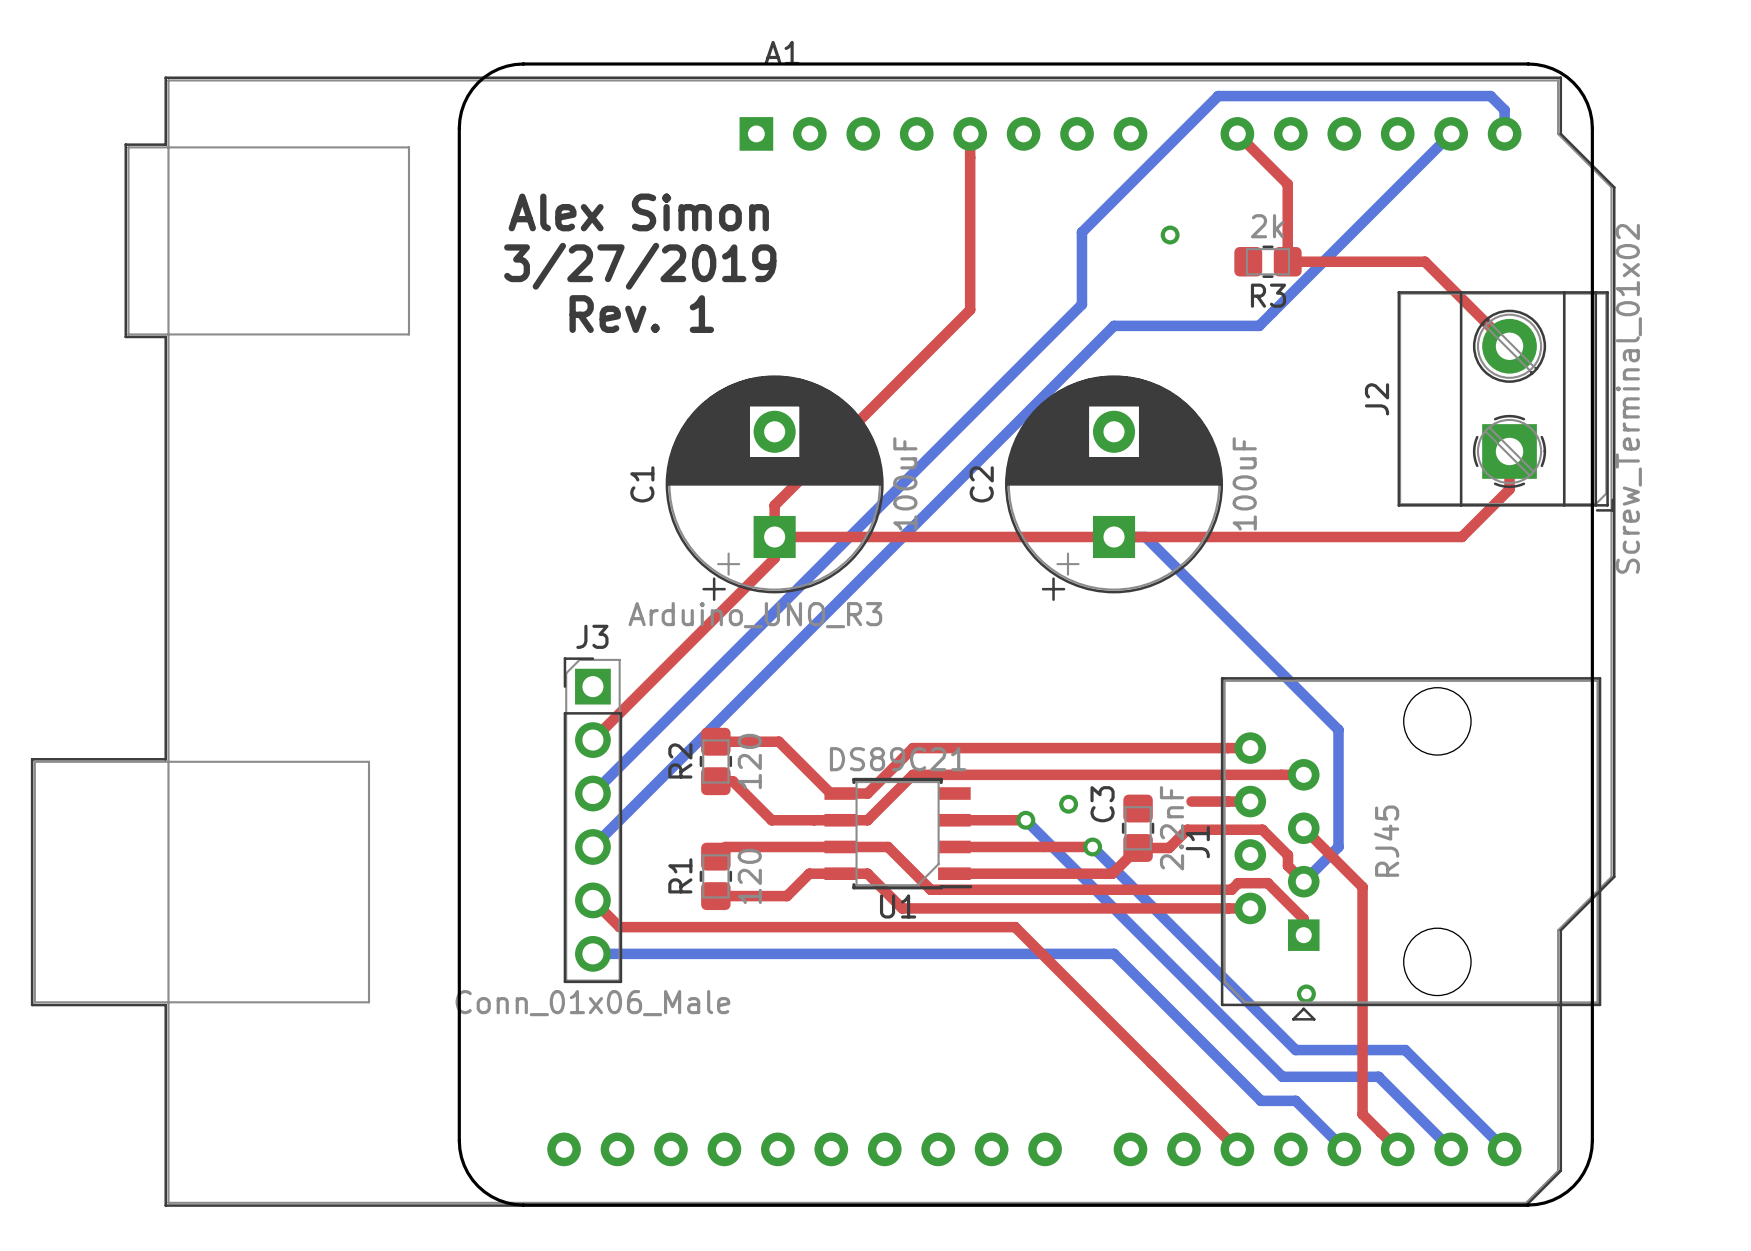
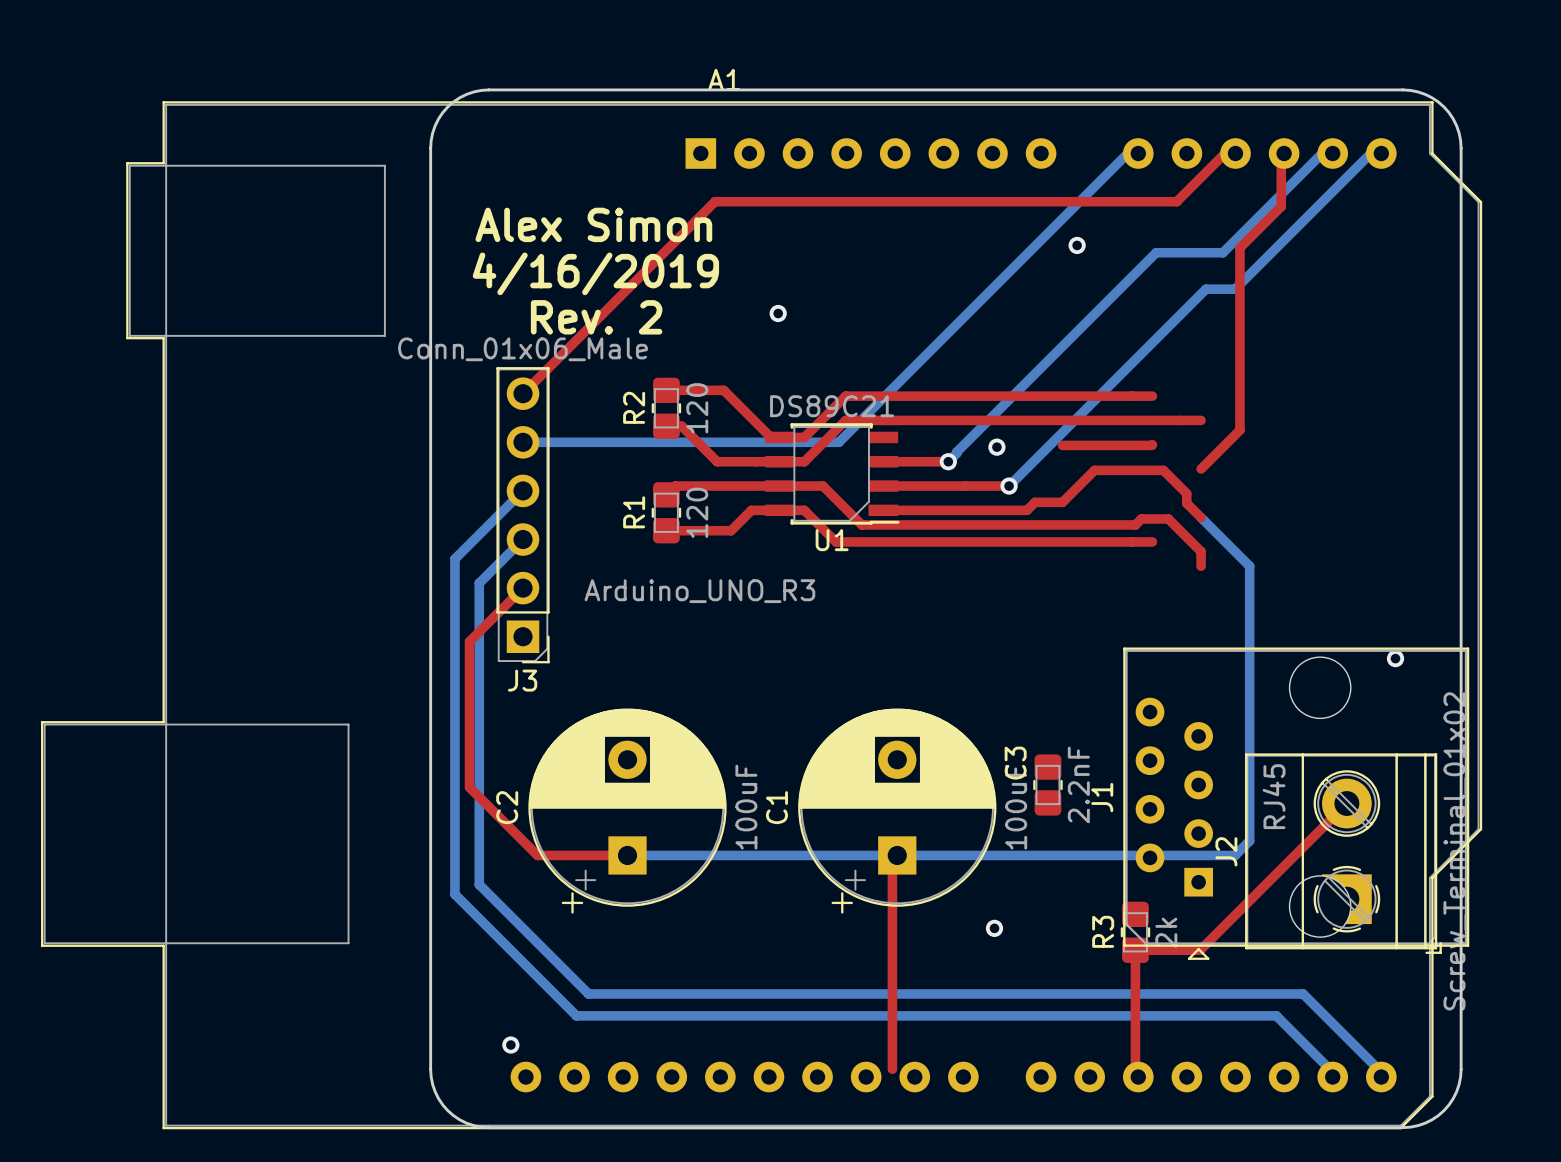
bottom track: none -> (1135, 145) (838, 442) (523, 442)
top track: none -> (1232, 145) (1176, 201) (715, 201) (523, 393)
top track: none -> (1281, 145) (1281, 206) (1239, 247) (1239, 430) (1201, 469)
bottom track: none -> (1329, 145) (1222, 252) (1156, 252) (948, 461)
bottom track: none -> (1378, 145) (1235, 289) (1205, 289) (1009, 486)
top track: (970, 133) (970, 309) (774, 505) (774, 558) (592, 740) -> none
top track: (1237, 133) (1287, 184) (1287, 261) (1425, 261) (1509, 346) -> none
bottom track: (1451, 133) (1259, 325) (1114, 325) (592, 846) -> none
bottom track: (1504, 133) (1504, 110) (1490, 96) (1218, 96) (1081, 232) (1081, 304) (592, 793) -> none
R3 rotation: 0° (1267, 261) -> 90° clockwise (1135, 932)
R3 position: (1267, 261) -> (1135, 932)
text: 3/27/2019 (640, 266) -> 4/16/2019 (595, 273)
via: none -> (778, 313)
text: Rev. 1 (641, 314) -> Rev. 2 (596, 317)
J2 position: (1505, 401) -> (1343, 853)
top track: (1509, 451) (1509, 489) (1461, 536) (774, 536) -> none
top track: none -> (1152, 444) (1062, 445)
via: none -> (996, 447)
via: none -> (948, 461)
C1 position: (774, 488) -> (897, 811)
C2 position: (1114, 488) -> (627, 811)
via: none -> (1009, 486)
bottom track: none -> (523, 490) (454, 558) (454, 894) (576, 1015) (1276, 1015) (1329, 1069)
top track: none -> (883, 510) (1027, 510) (1035, 502) (1062, 502) (1094, 470) (1163, 470) (1186, 493) (1186, 503) (1201, 517)
bottom track: none -> (1201, 517) (1249, 566) (1249, 840) (1235, 855) (627, 855)
bottom track: (1114, 536) (1145, 536) (1338, 729) (1338, 846) (1303, 881) -> none
bottom track: none -> (523, 539) (479, 583) (479, 884) (588, 993) (1303, 993) (1378, 1069)
top track: none -> (523, 588) (469, 641) (469, 787) (537, 855) (627, 855)
via: none -> (1395, 658)
top track: (715, 741) (778, 741) (830, 793) (867, 793) (913, 748) (1250, 748) -> (666, 390) (723, 390) (770, 437) (804, 437) (845, 396) (1152, 396)
R2 position: (715, 761) -> (666, 408)
top track: (1303, 774) (913, 774) (867, 820) (771, 820) (732, 781) (715, 781) -> (1201, 420) (845, 420) (804, 461) (717, 461) (681, 426) (666, 426)
top track: (1191, 801) (1250, 801) -> none
via: (1068, 804) -> none
J3 rotation: 0° (592, 820) -> 180° (523, 515)
J3 position: (592, 820) -> (523, 515)
top track: (954, 820) (1025, 820) -> (883, 461) (948, 461)
bottom track: (1025, 820) (1282, 1076) (1378, 1076) (1451, 1149) -> none
via: (1025, 820) -> none
top track: (1303, 828) (1362, 887) (1362, 1114) (1397, 1149) -> none
U1 position: (898, 833) -> (832, 473)
top track: (954, 846) (1092, 846) -> (883, 486) (1009, 486)
bottom track: (1092, 846) (1295, 1050) (1405, 1050) (1504, 1149) -> none
via: (1092, 846) -> none
top track: none -> (1346, 803) (1200, 950) (1135, 950) (1135, 1069)
top track: (715, 856) (725, 846) (887, 846) (930, 889) (1231, 889) (1238, 883) (1267, 883) (1303, 919) (1303, 935) -> (666, 494) (675, 486) (822, 486) (861, 524) (1135, 524) (1141, 518) (1168, 518) (1201, 551) (1201, 566)
top track: (954, 873) (1112, 873) (1138, 847) (1169, 847) (1187, 829) (1262, 829) (1287, 855) (1287, 865) (1303, 881) -> none
R1 position: (715, 876) -> (666, 512)
top track: (715, 896) (786, 896) (809, 873) (867, 873) (902, 908) (1250, 908) -> (666, 530) (731, 530) (751, 510) (804, 510) (835, 541) (1152, 541)
top track: (592, 900) (619, 927) (1015, 927) (1237, 1149) -> none
top track: none -> (897, 855) (892, 860) (892, 1069)
bottom track: (592, 953) (1114, 953) (1261, 1100) (1295, 1100) (1344, 1149) -> none
via: none -> (994, 928)
via: (1306, 993) -> none
via: none -> (510, 1045)

